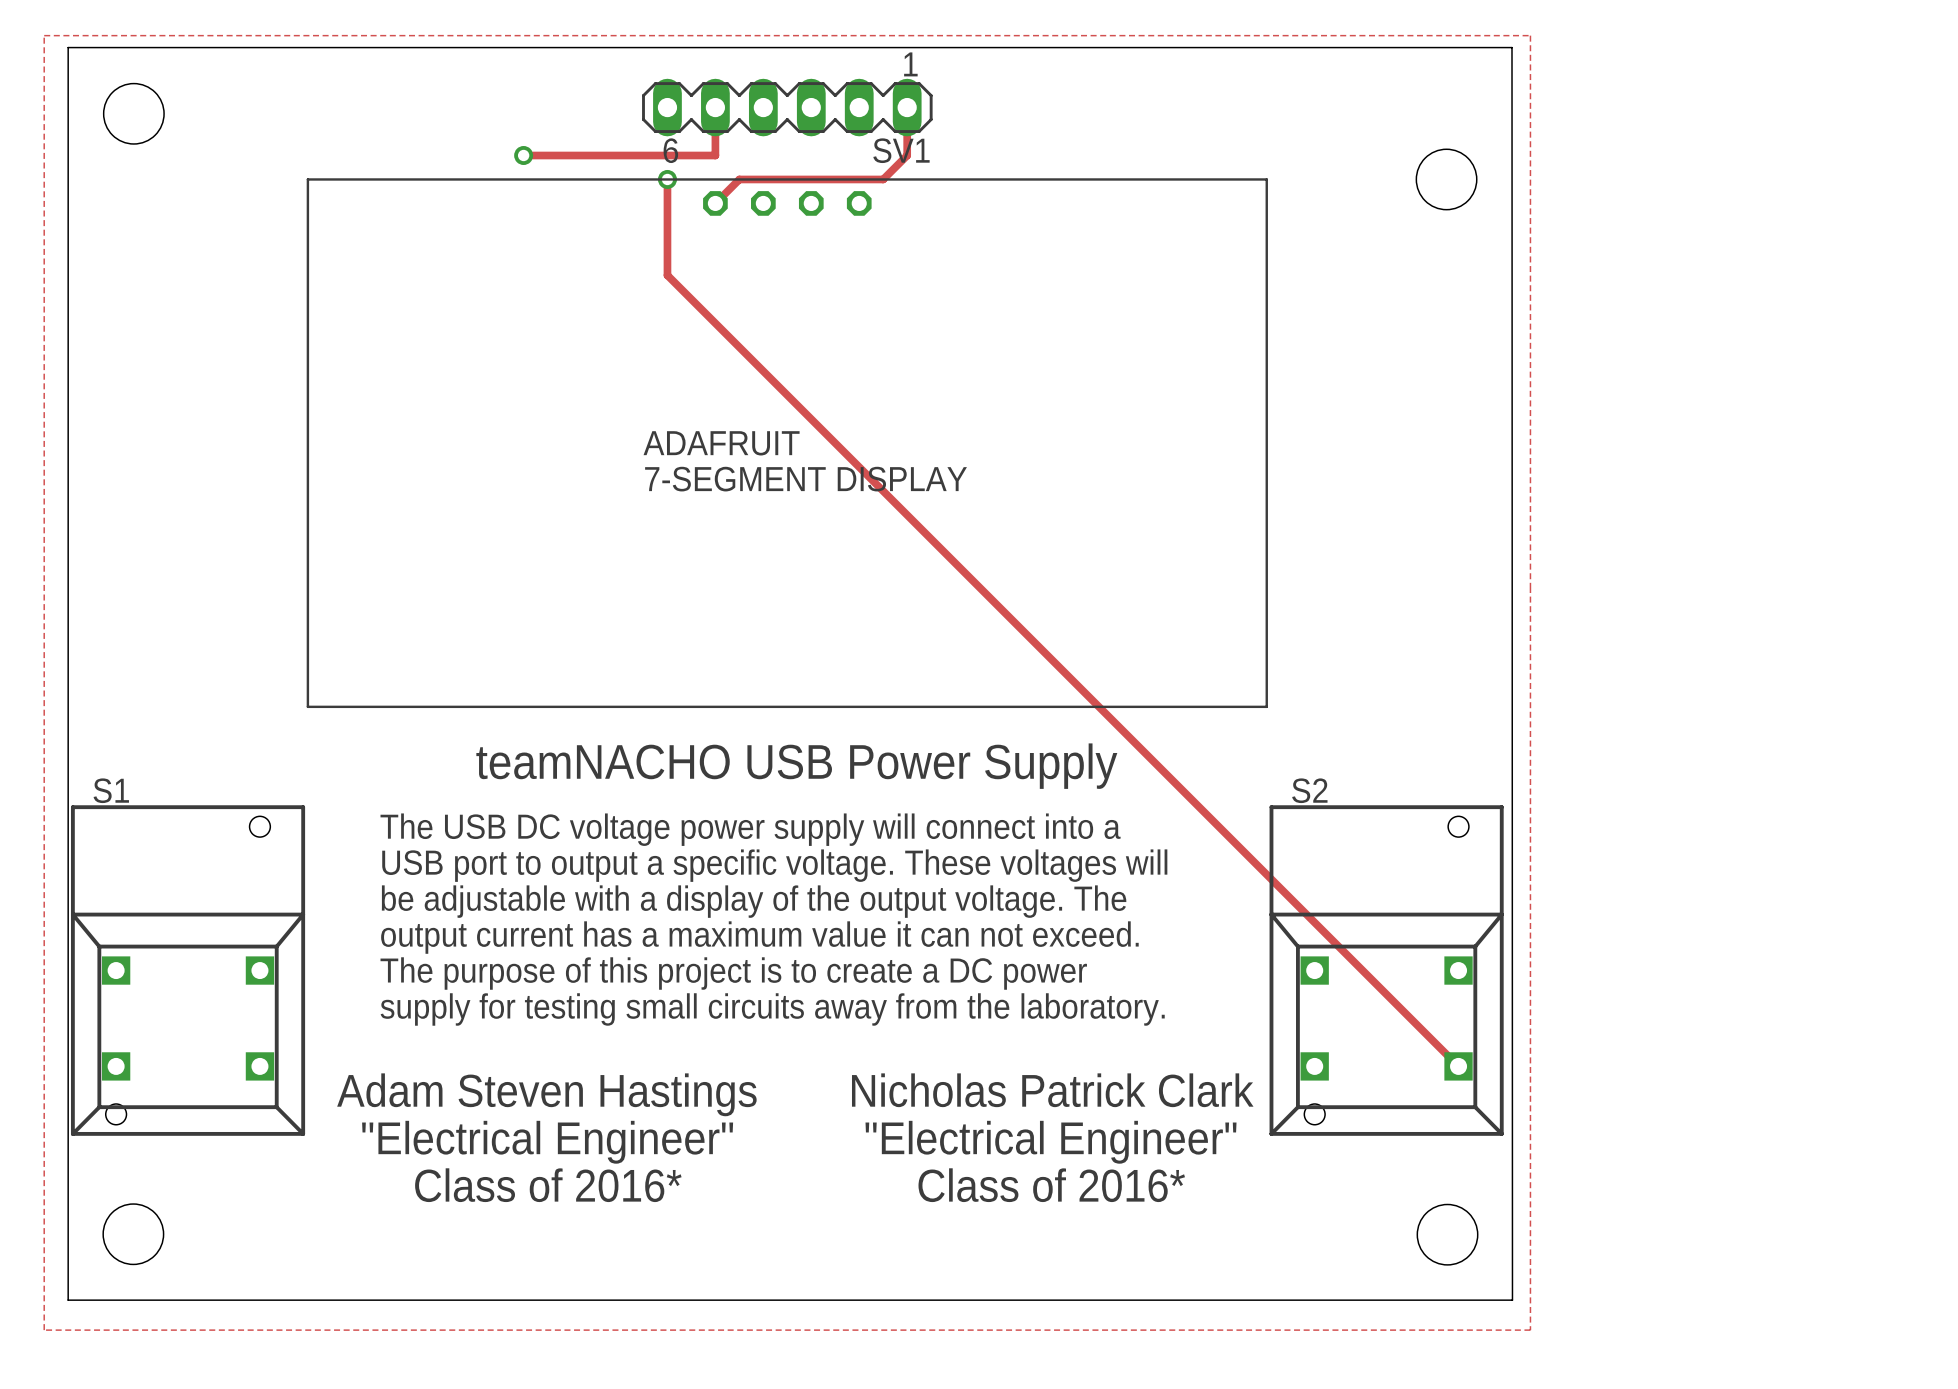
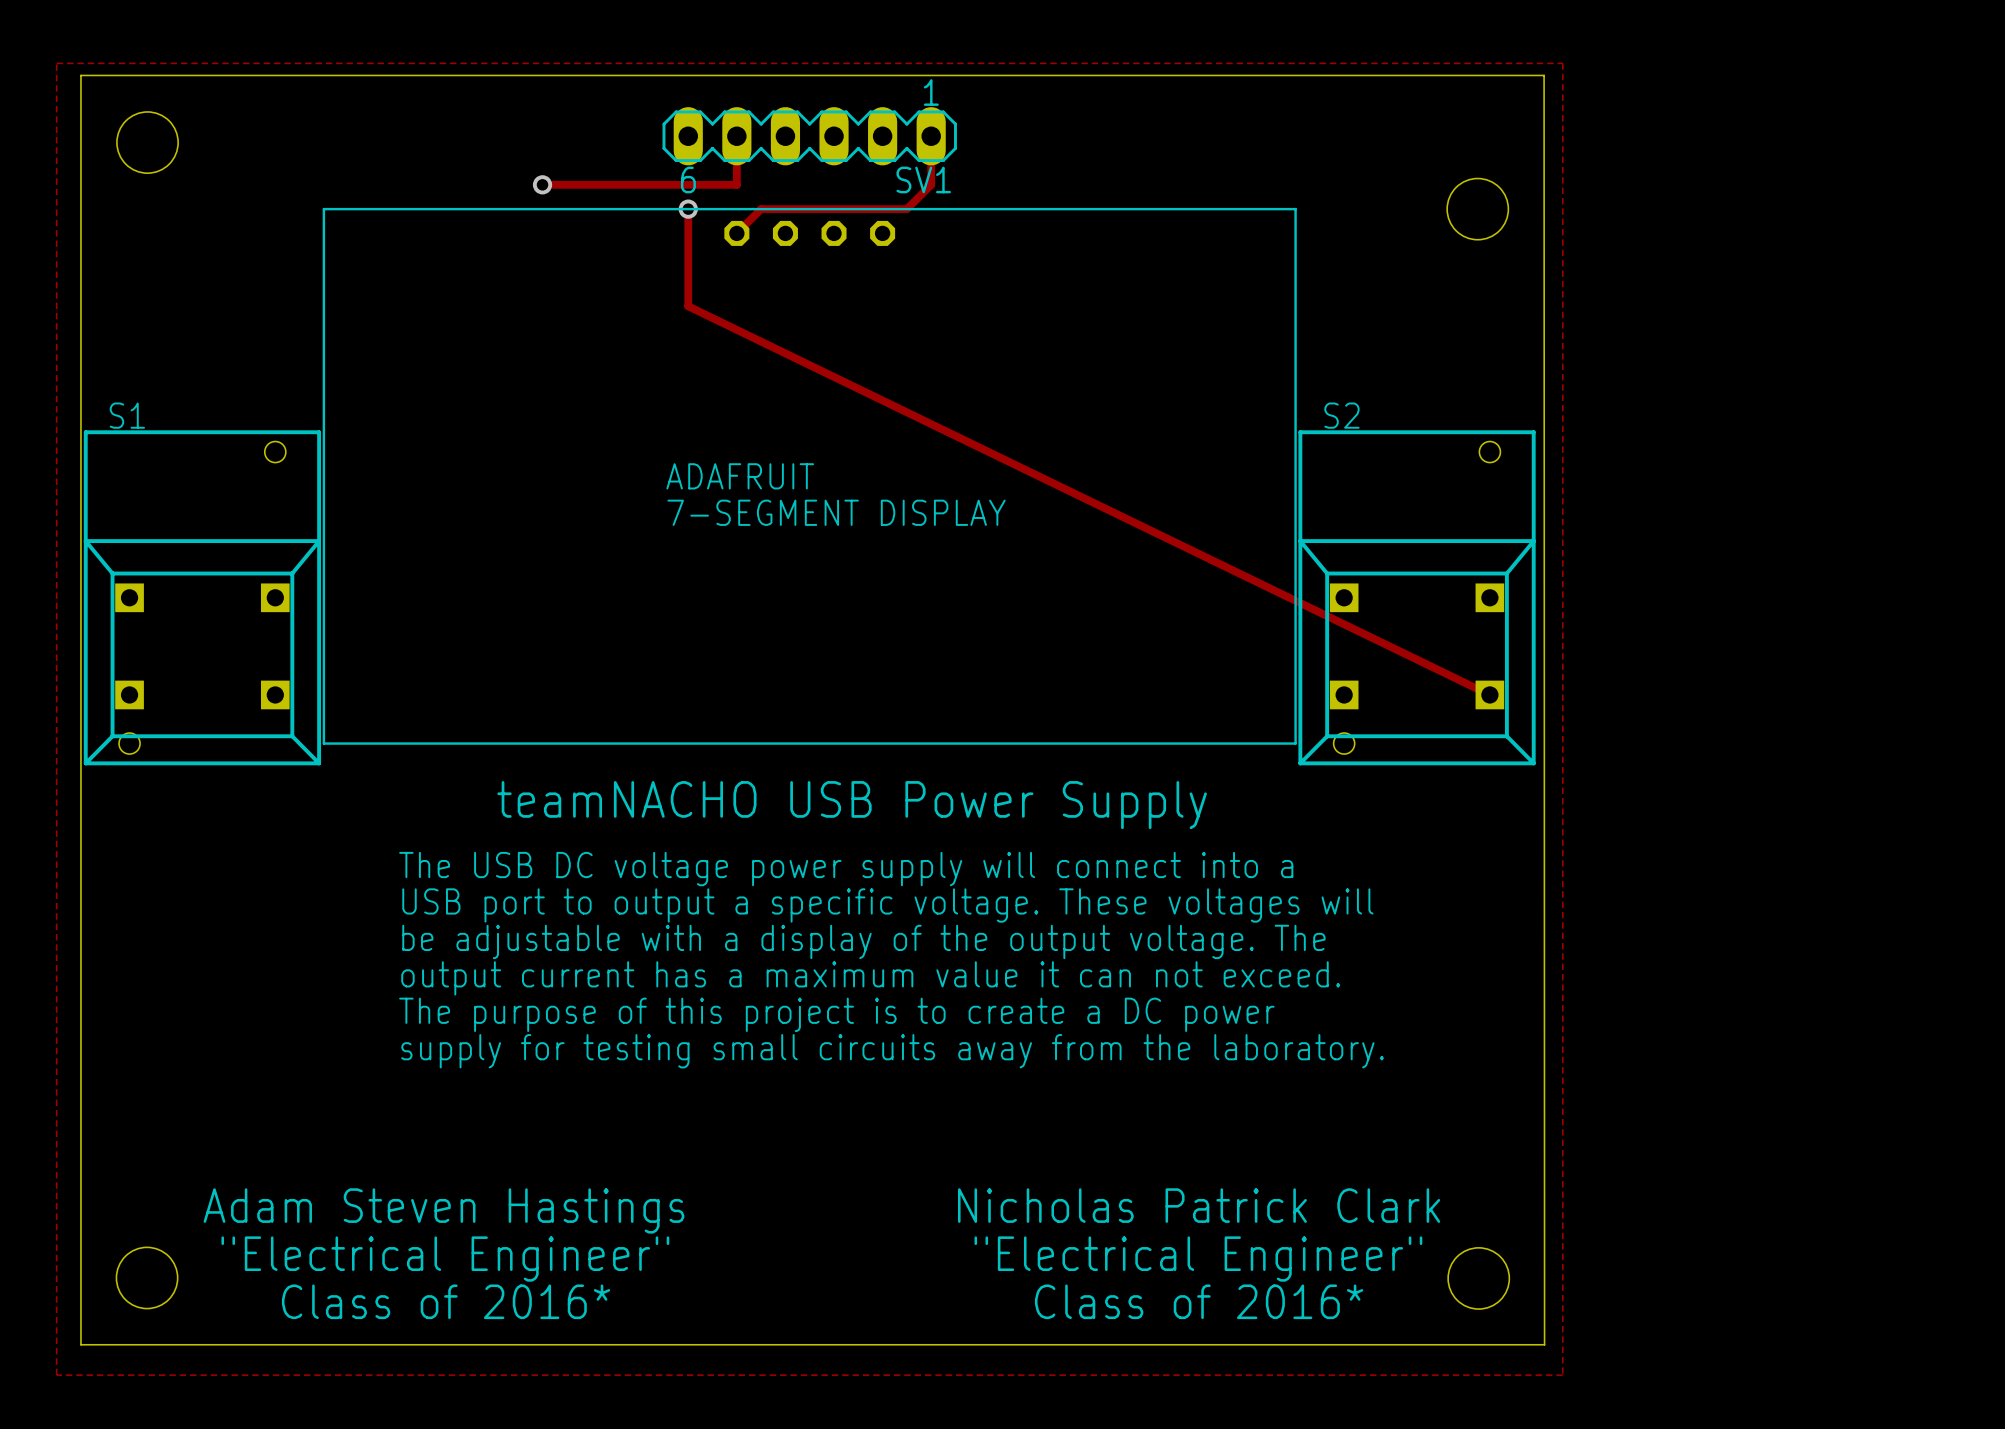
track: (667, 275) (1458, 1066) -> (688, 306) (1489, 694)
S1 position: (188, 970) -> (202, 597)
S2 position: (1386, 970) -> (1417, 597)
text position: Nicholas Patrick Clark (1052, 1090) -> Nicholas Patrick Clark (1199, 1205)
text position: Adam Steven Hastings (546, 1094) -> Adam Steven Hastings (443, 1210)
text position: "Electrical Engineer" (547, 1142) -> "Electrical Engineer" (445, 1259)
text position: "Electrical Engineer" (1051, 1142) -> "Electrical Engineer" (1198, 1259)
text position: Class of 2016* (548, 1185) -> Class of 2016* (446, 1301)
text position: Class of 2016* (1051, 1185) -> Class of 2016* (1199, 1301)

